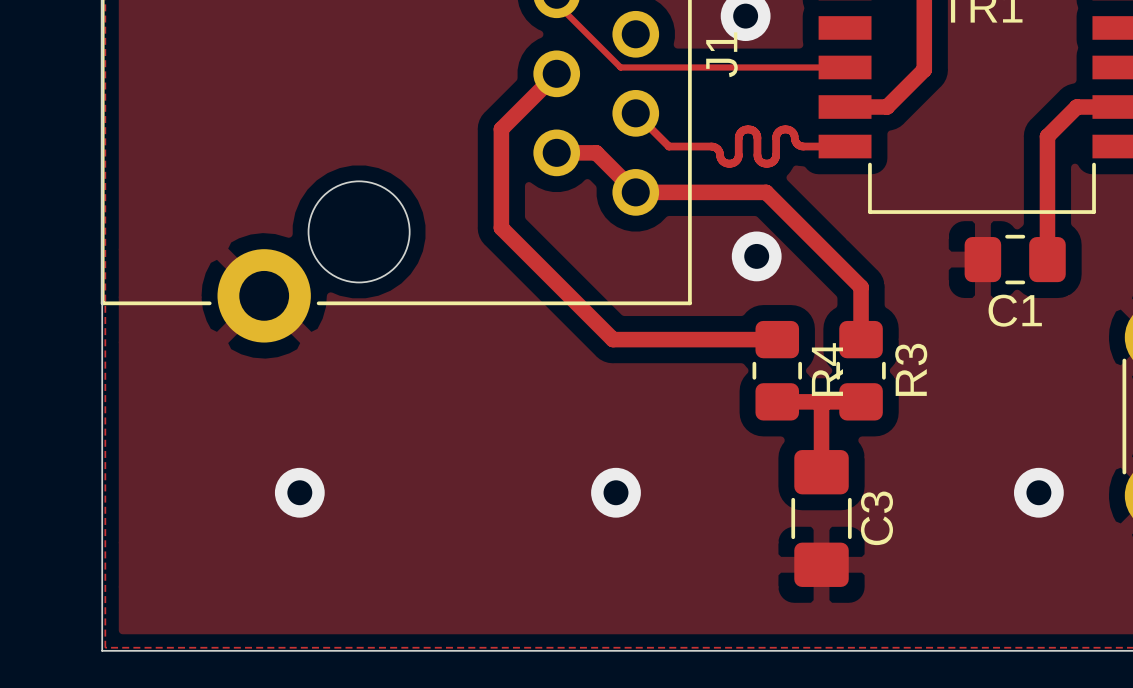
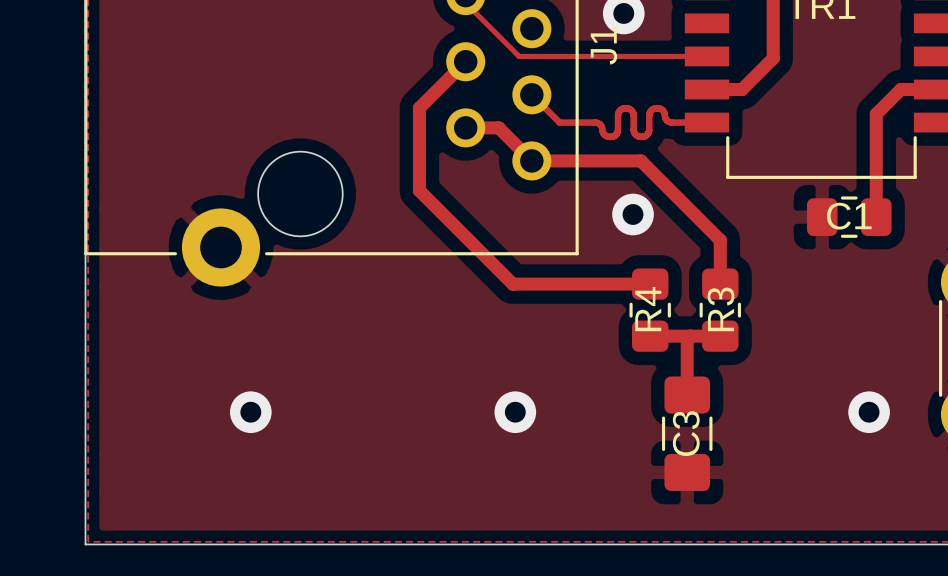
C1 name position: C1 (1015, 310) -> C1 (849, 216)
R4 name position: R4 (827, 369) -> R4 (648, 309)
R3 name position: R3 (911, 369) -> R3 (720, 309)
C3 name position: C3 (876, 518) -> C3 (686, 433)

